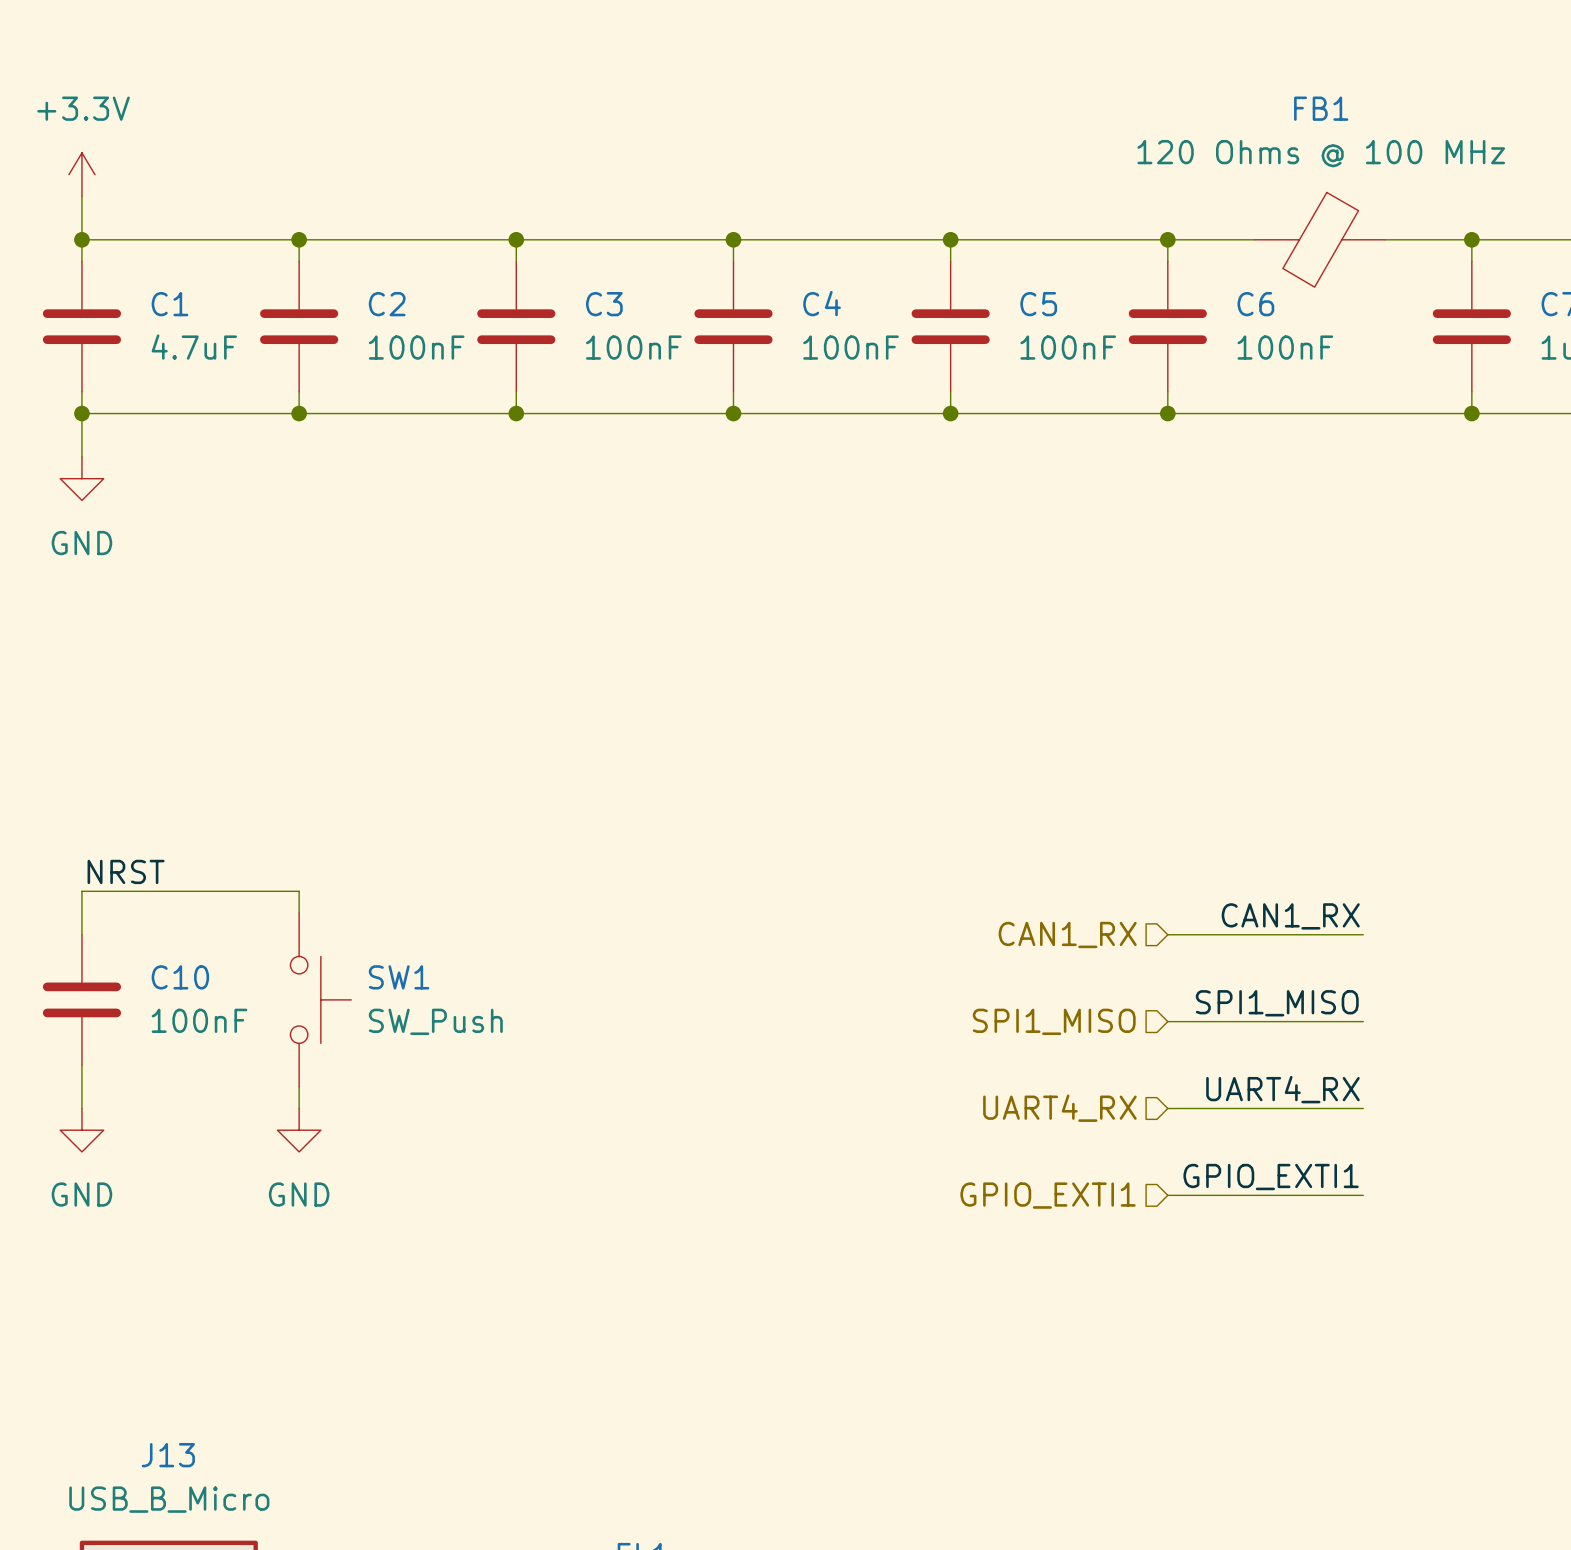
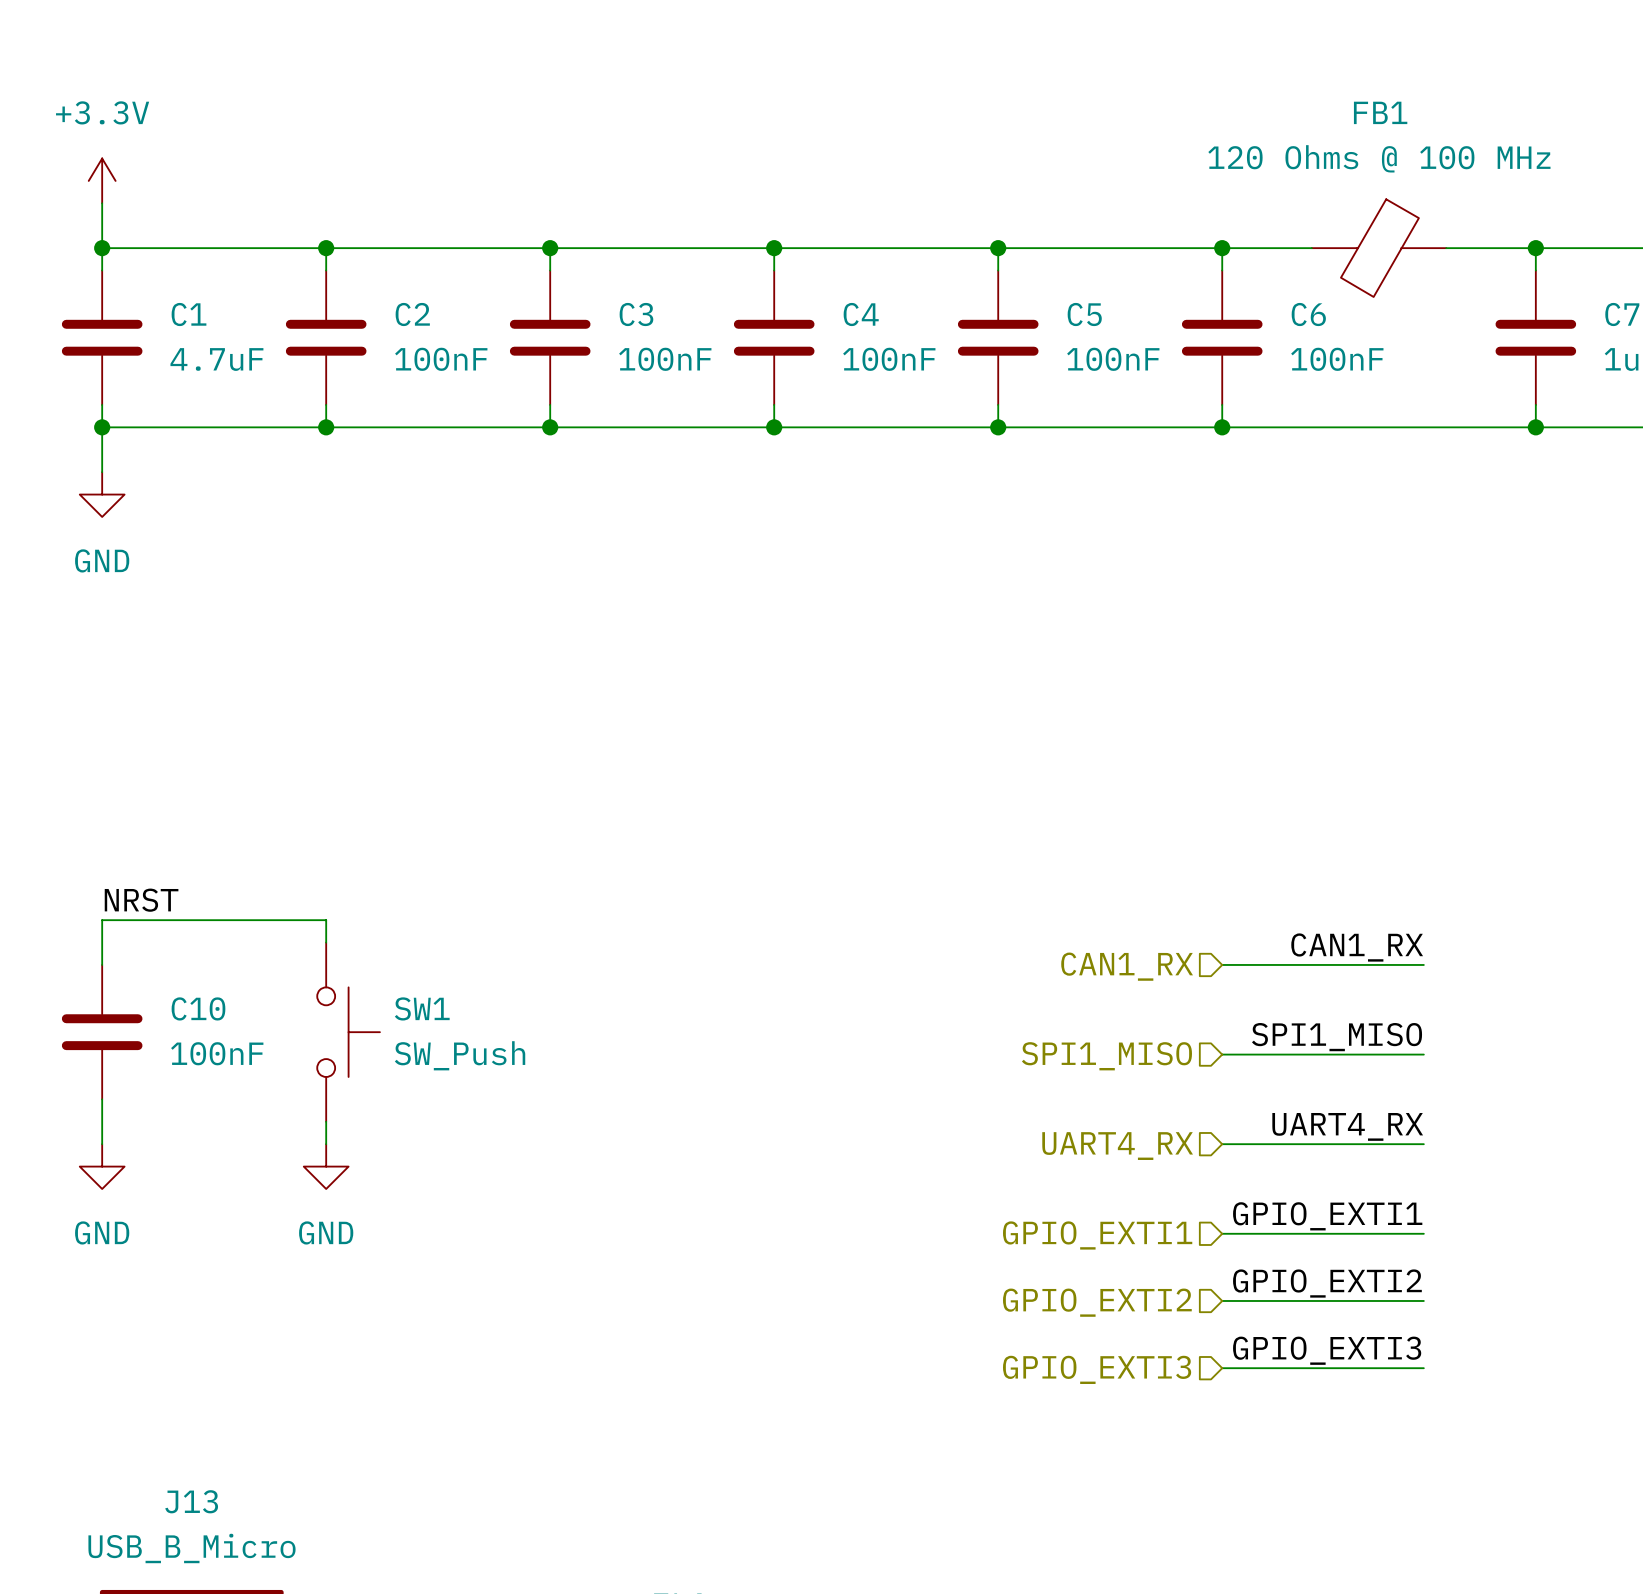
label: none -> GPIO_EXTI2 (1327, 1283)
hierarchical label: none -> GPIO_EXTI2 (1097, 1302)
wire: none -> (1222, 1300) (1423, 1300)
label: none -> GPIO_EXTI3 (1327, 1350)
hierarchical label: none -> GPIO_EXTI3 (1097, 1369)
wire: none -> (1222, 1368) (1423, 1368)

